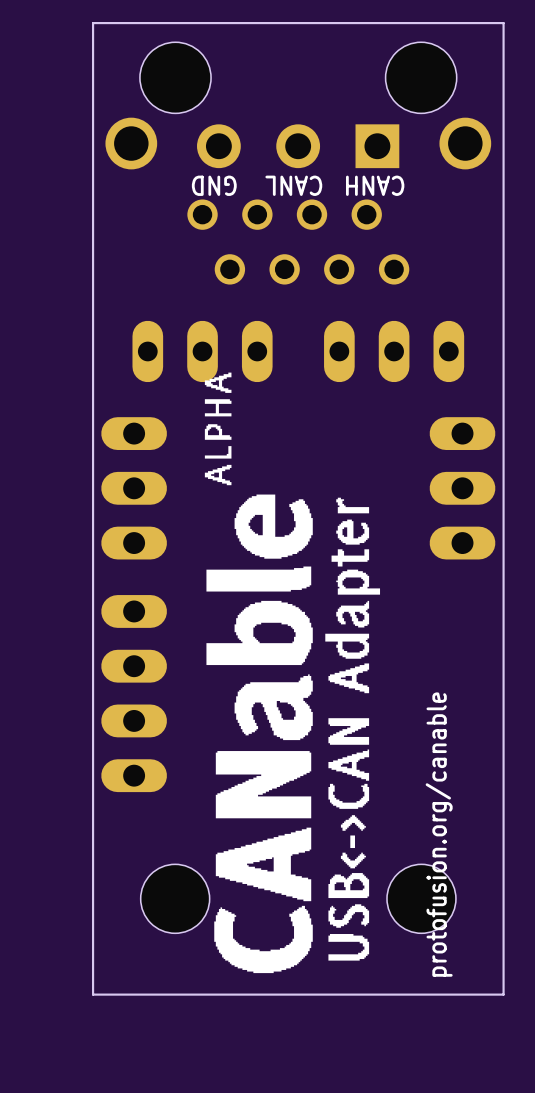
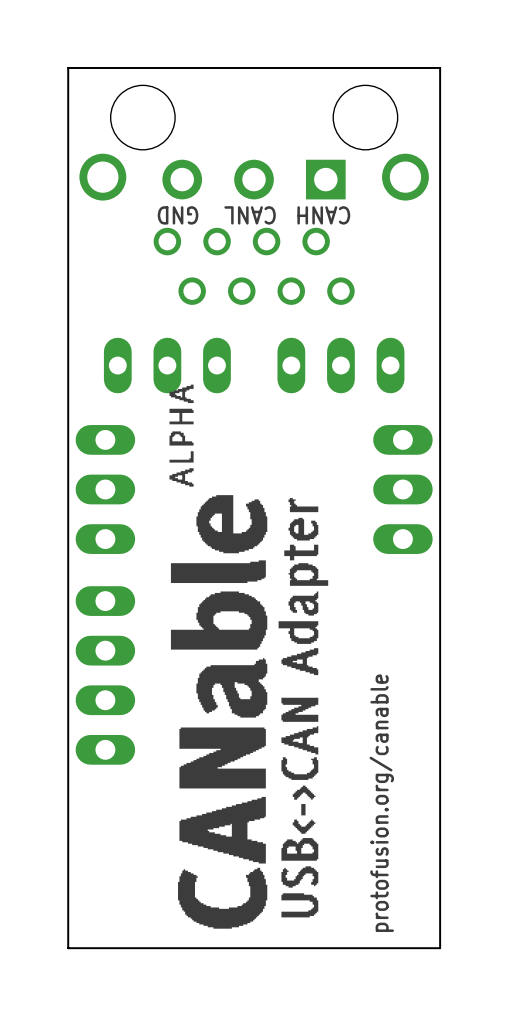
hole: (175, 898) -> none
hole: (421, 898) -> none

